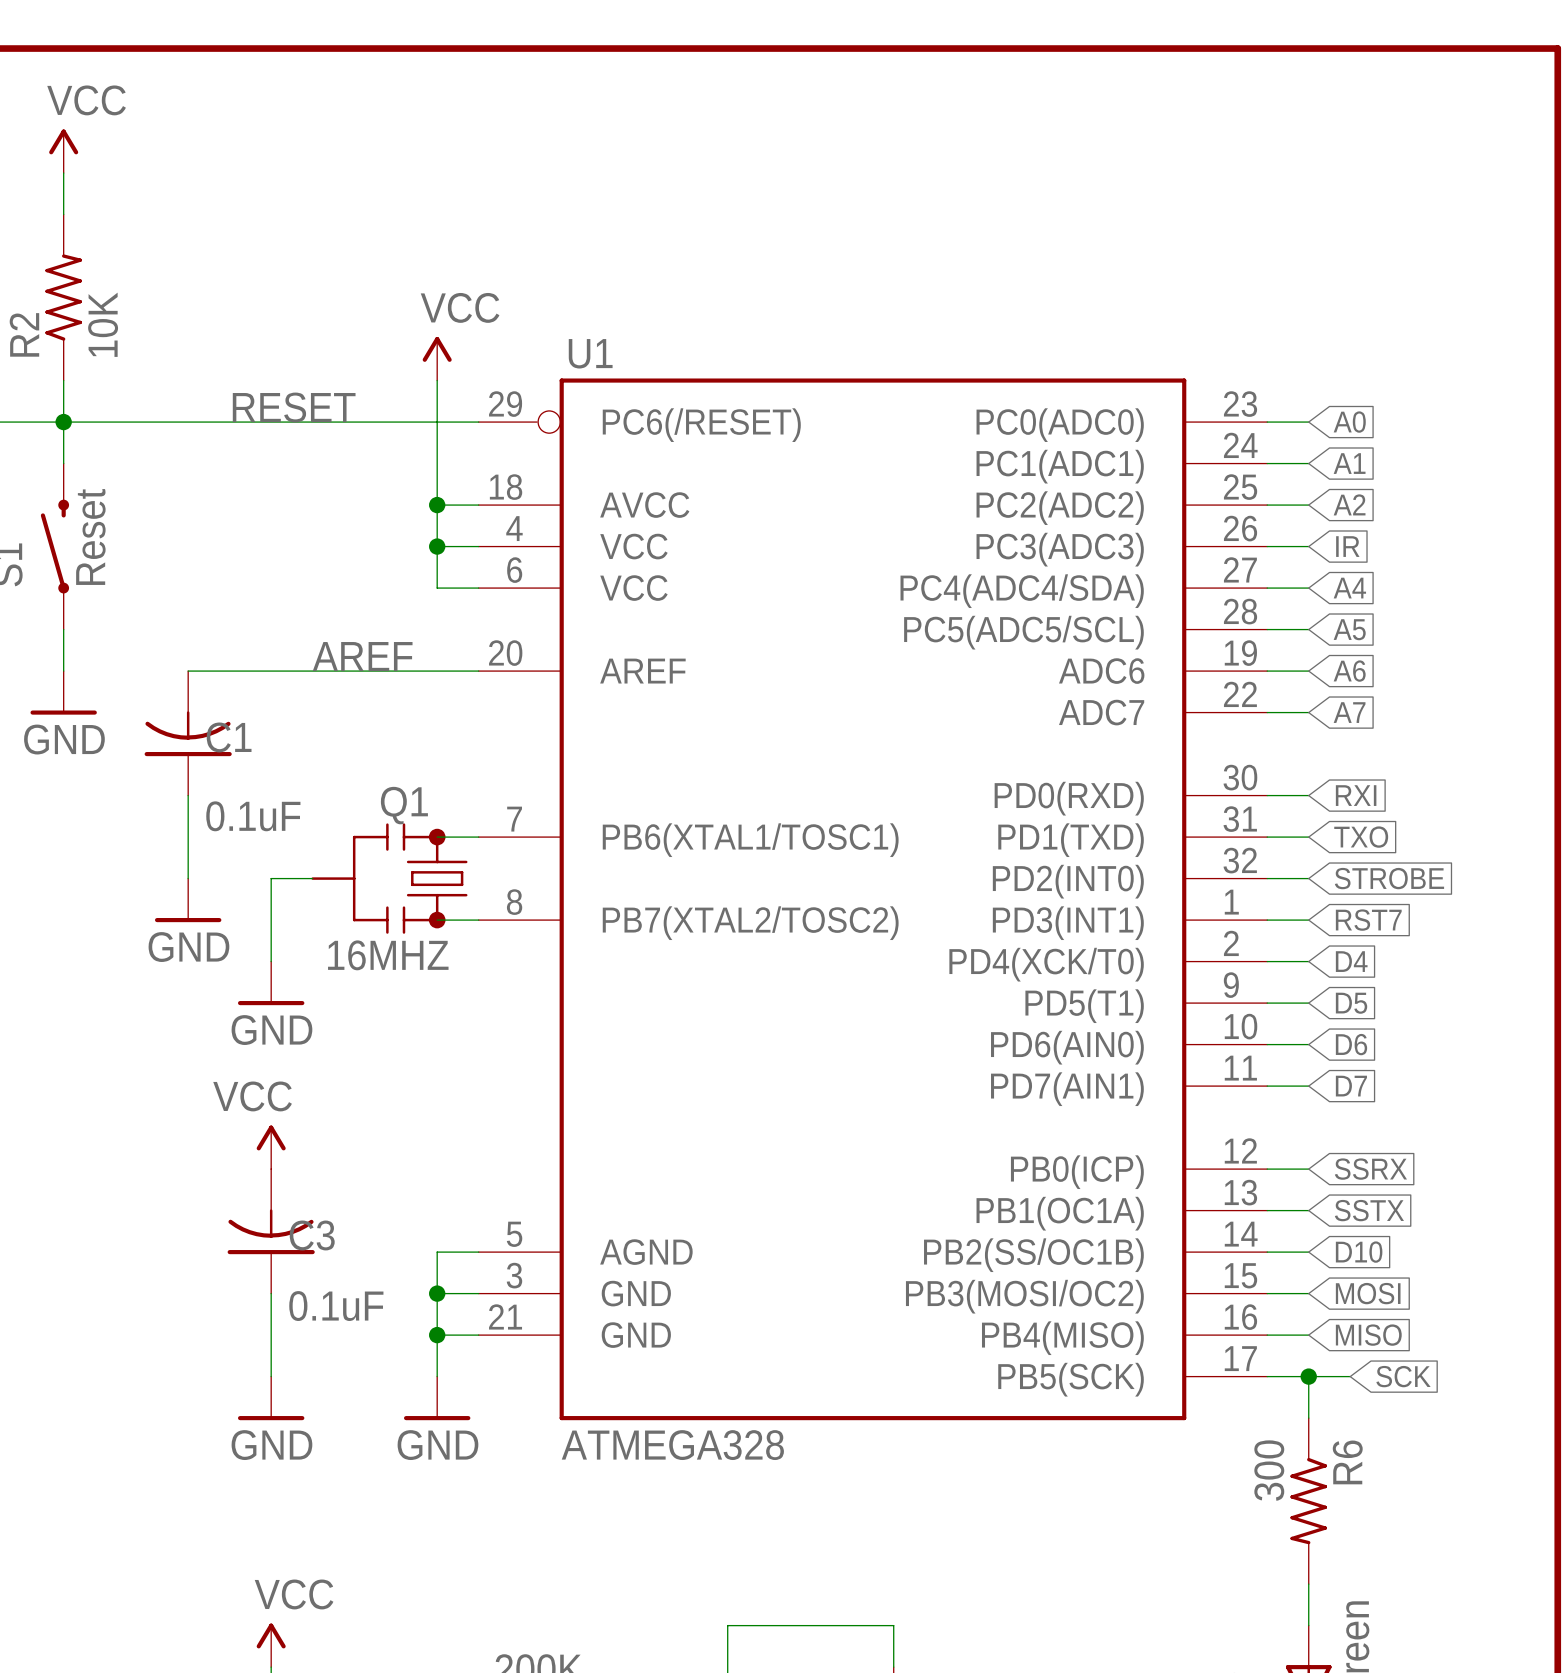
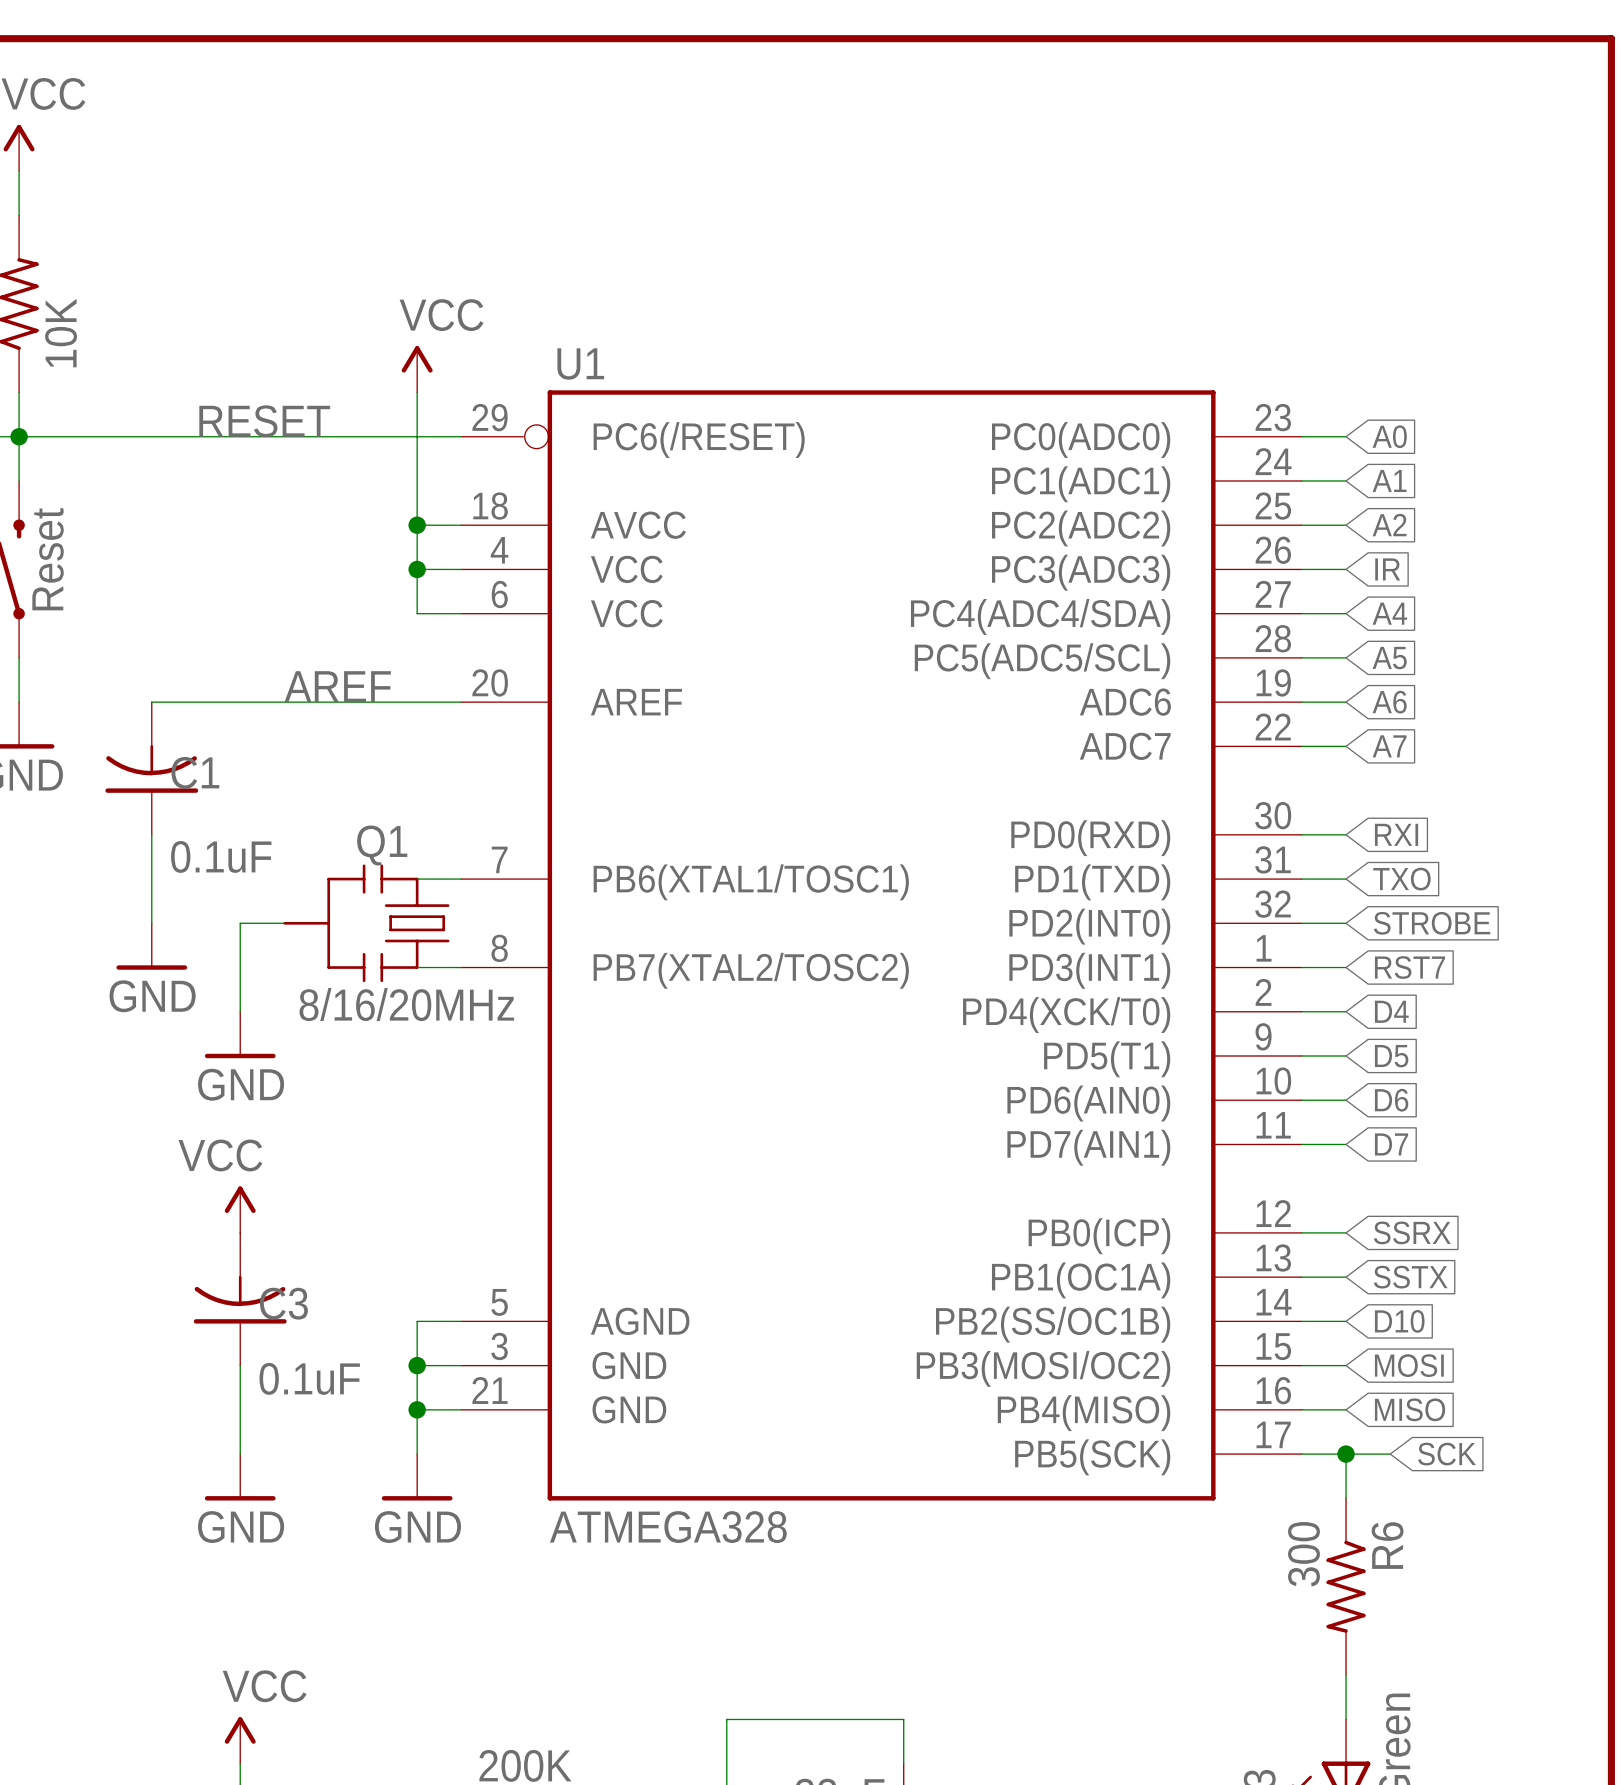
Q1 symbol: [311, 823, 468, 934] -> [283, 864, 450, 983]
Q1 value: 16MHZ (388, 955) -> 8/16/20MHz (406, 1004)

